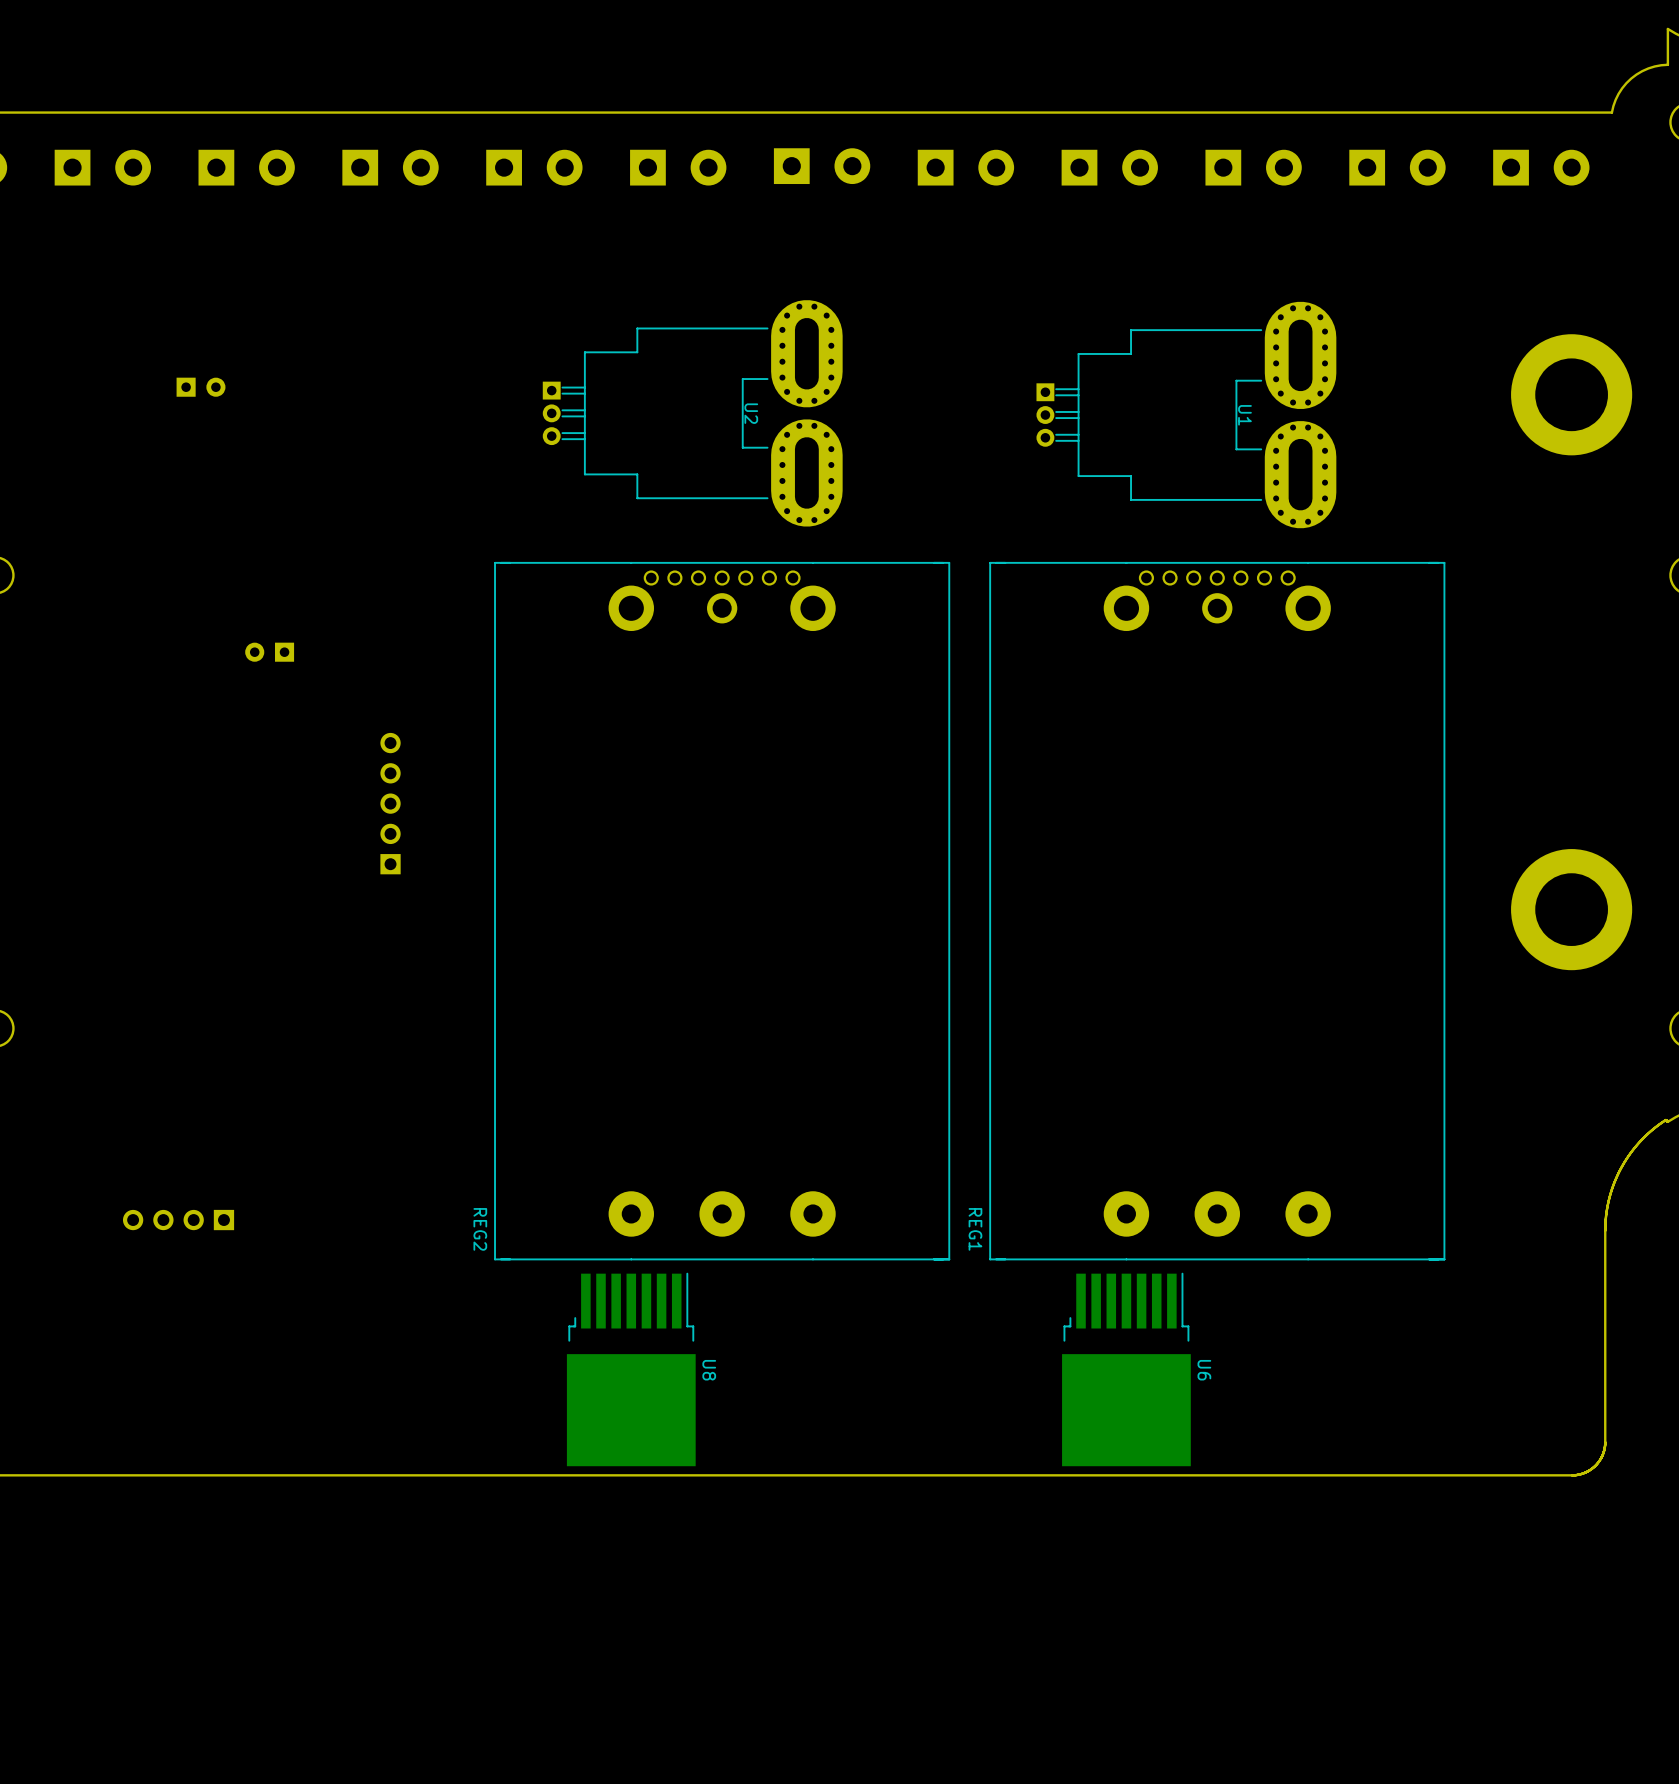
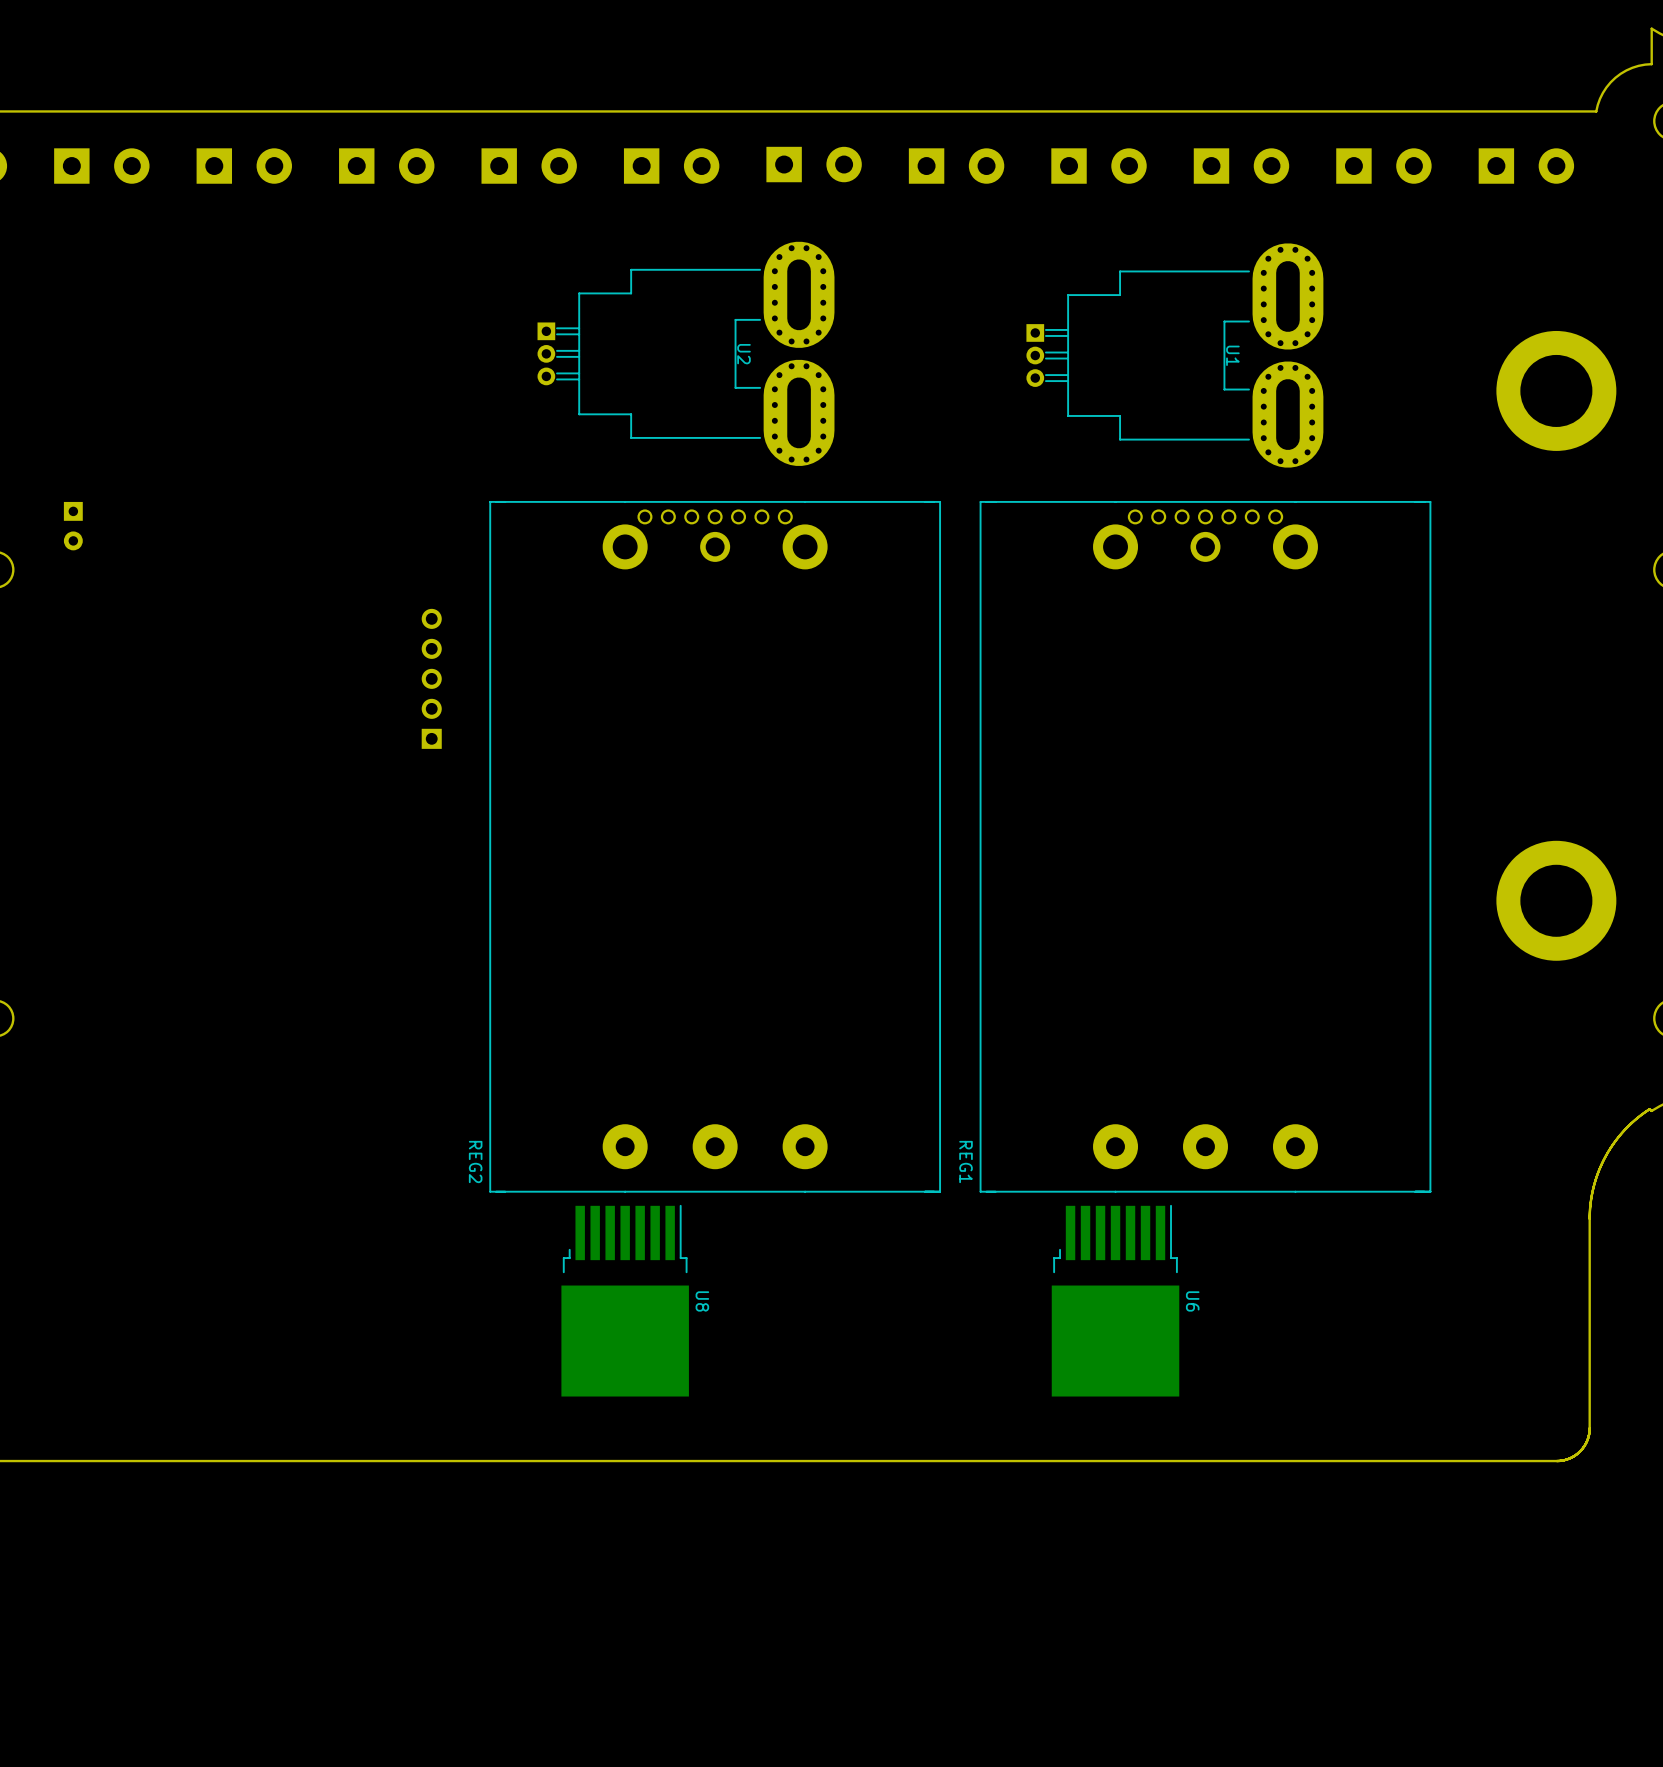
part: (201, 387) -> none
U2 position: (692, 413) -> (686, 353)
U1 position: (1186, 415) -> (1174, 355)
part: none -> (73, 526)
part: (269, 652) -> none
part position: (390, 803) -> (431, 678)
REG2 position: (722, 911) -> (715, 846)
REG1 position: (1217, 911) -> (1205, 846)
part: (178, 1220) -> none
U8 position: (631, 1369) -> (625, 1300)
U6 position: (1126, 1369) -> (1115, 1300)

